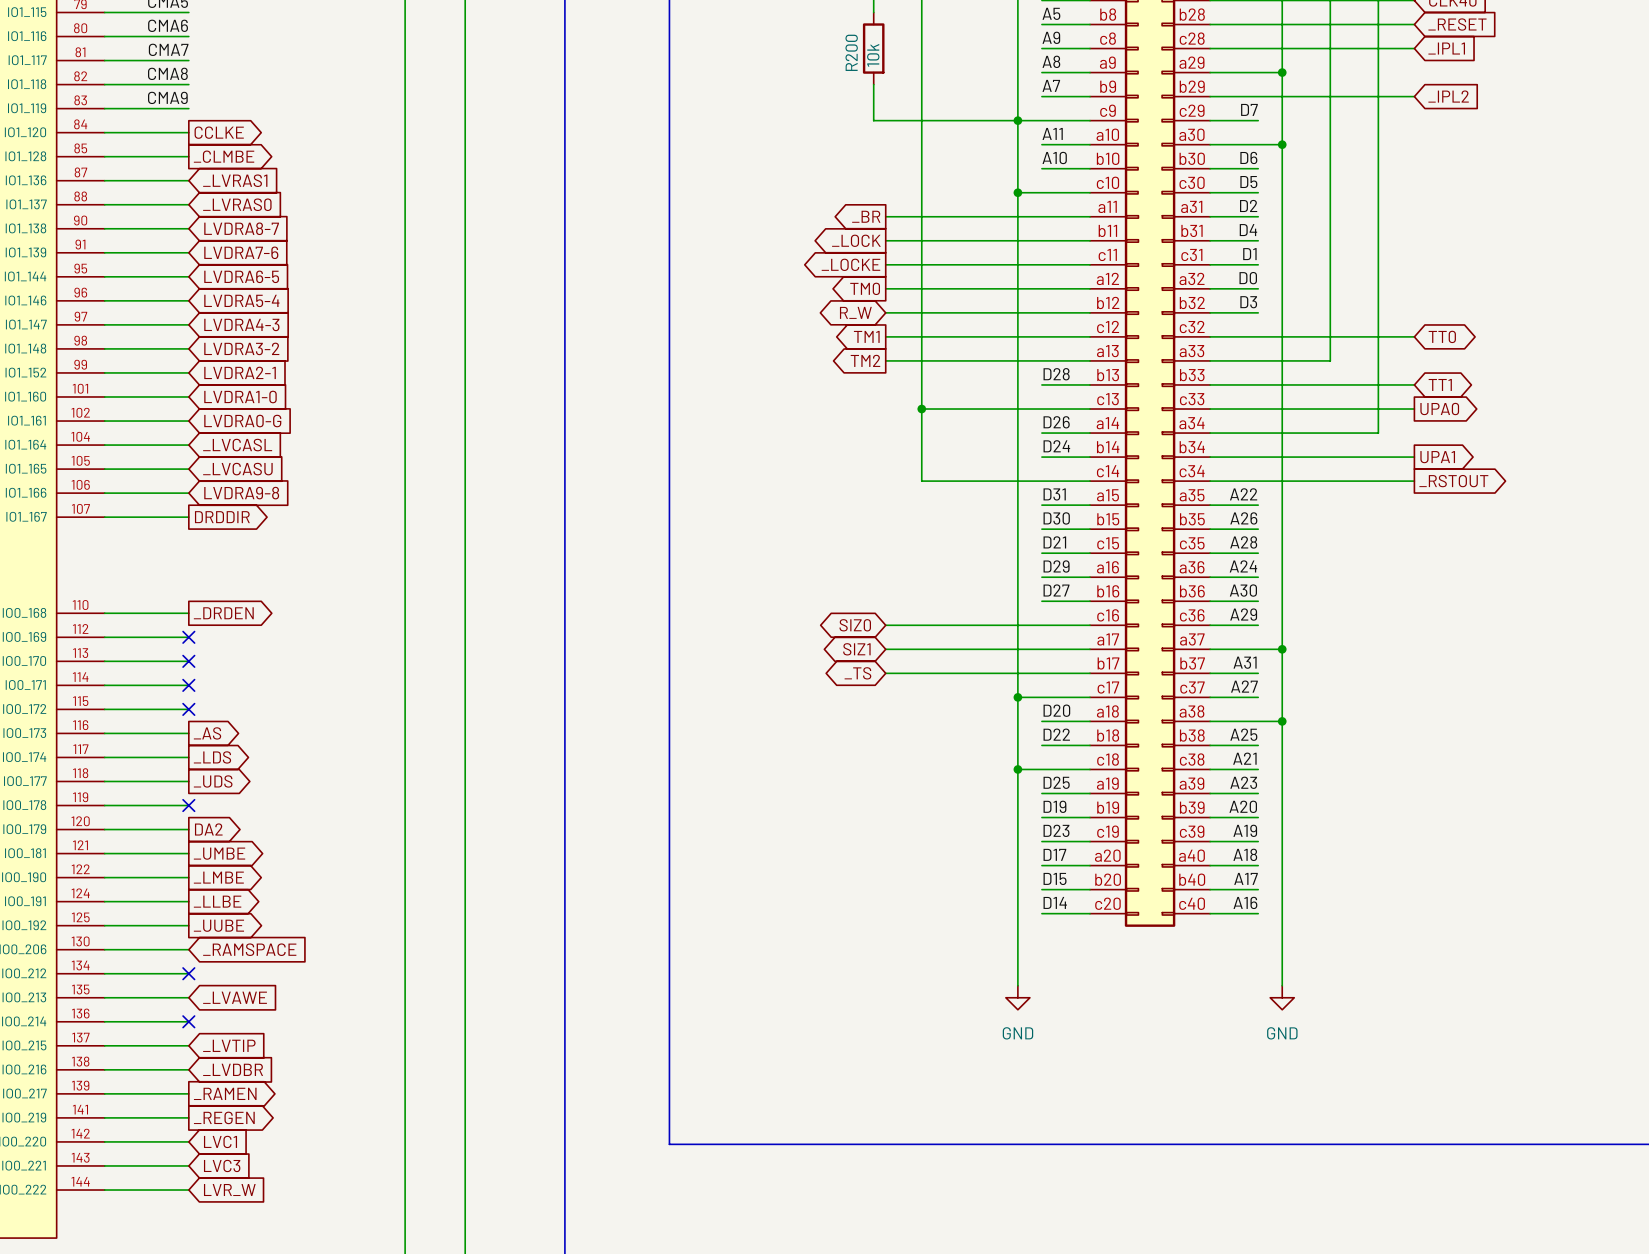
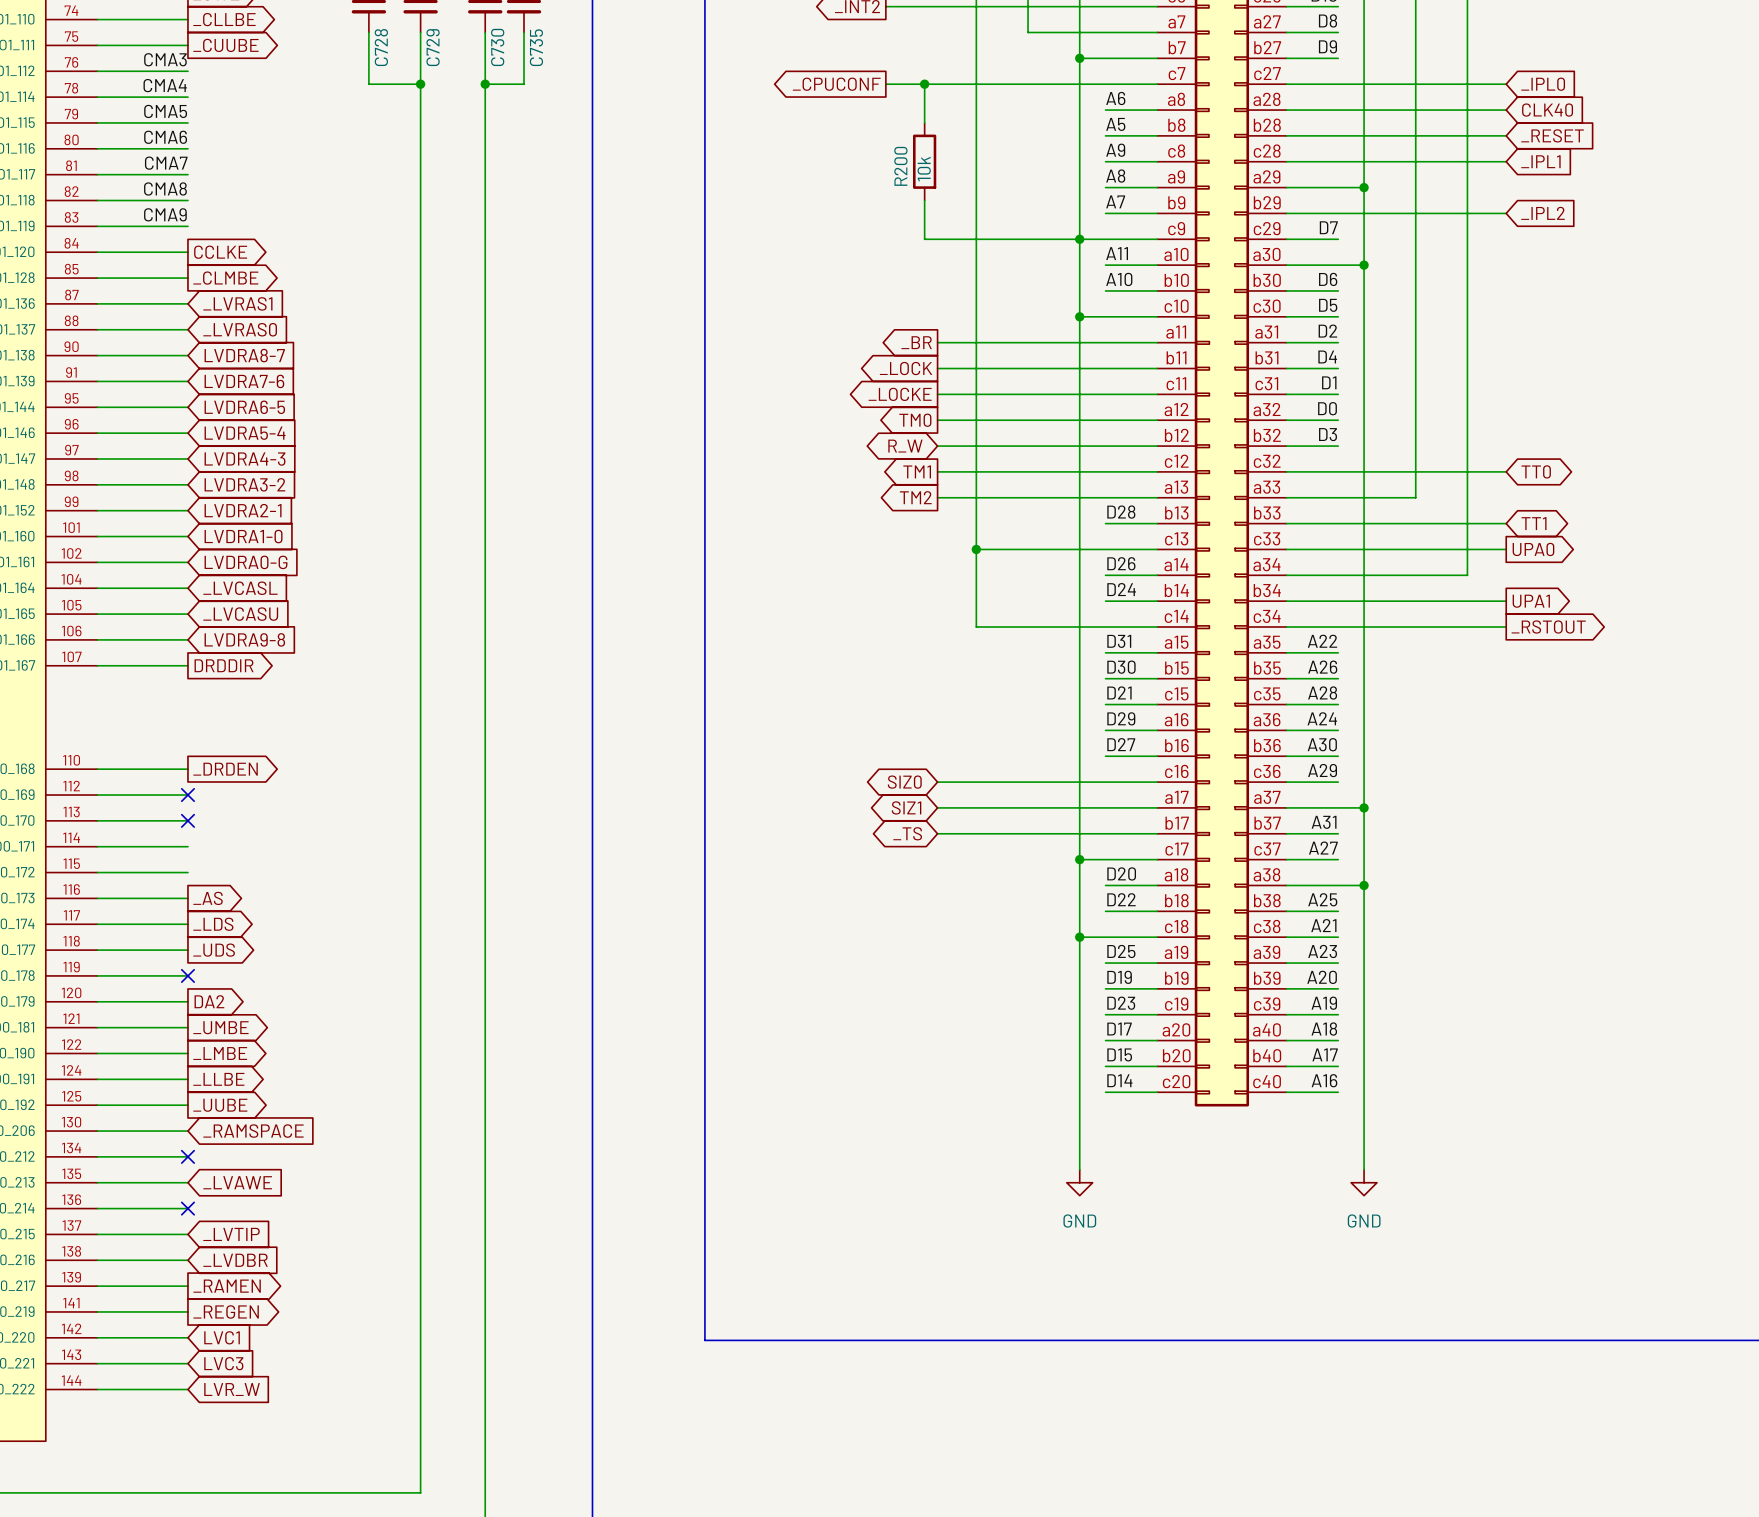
no-connect mark: (188, 685) -> none
no-connect mark: (188, 709) -> none

